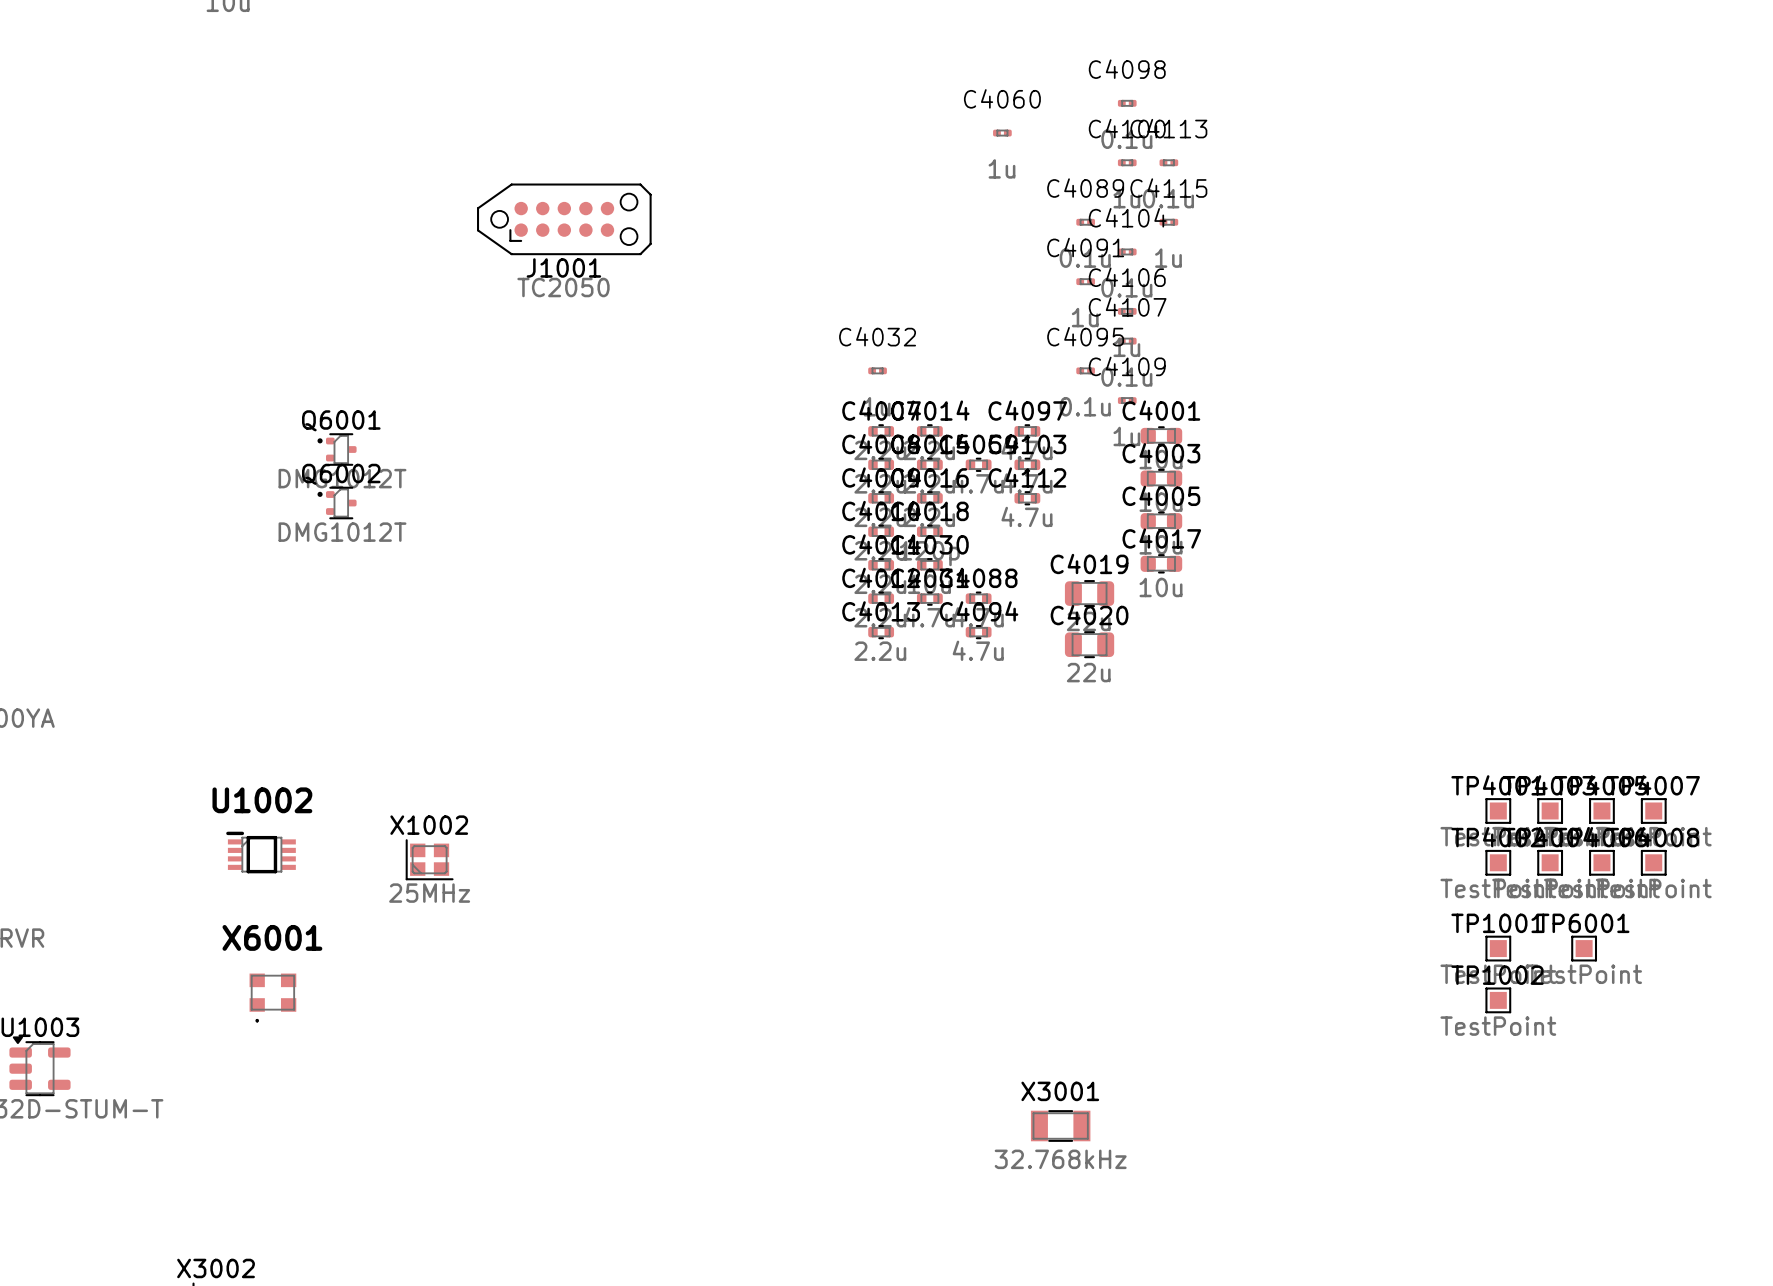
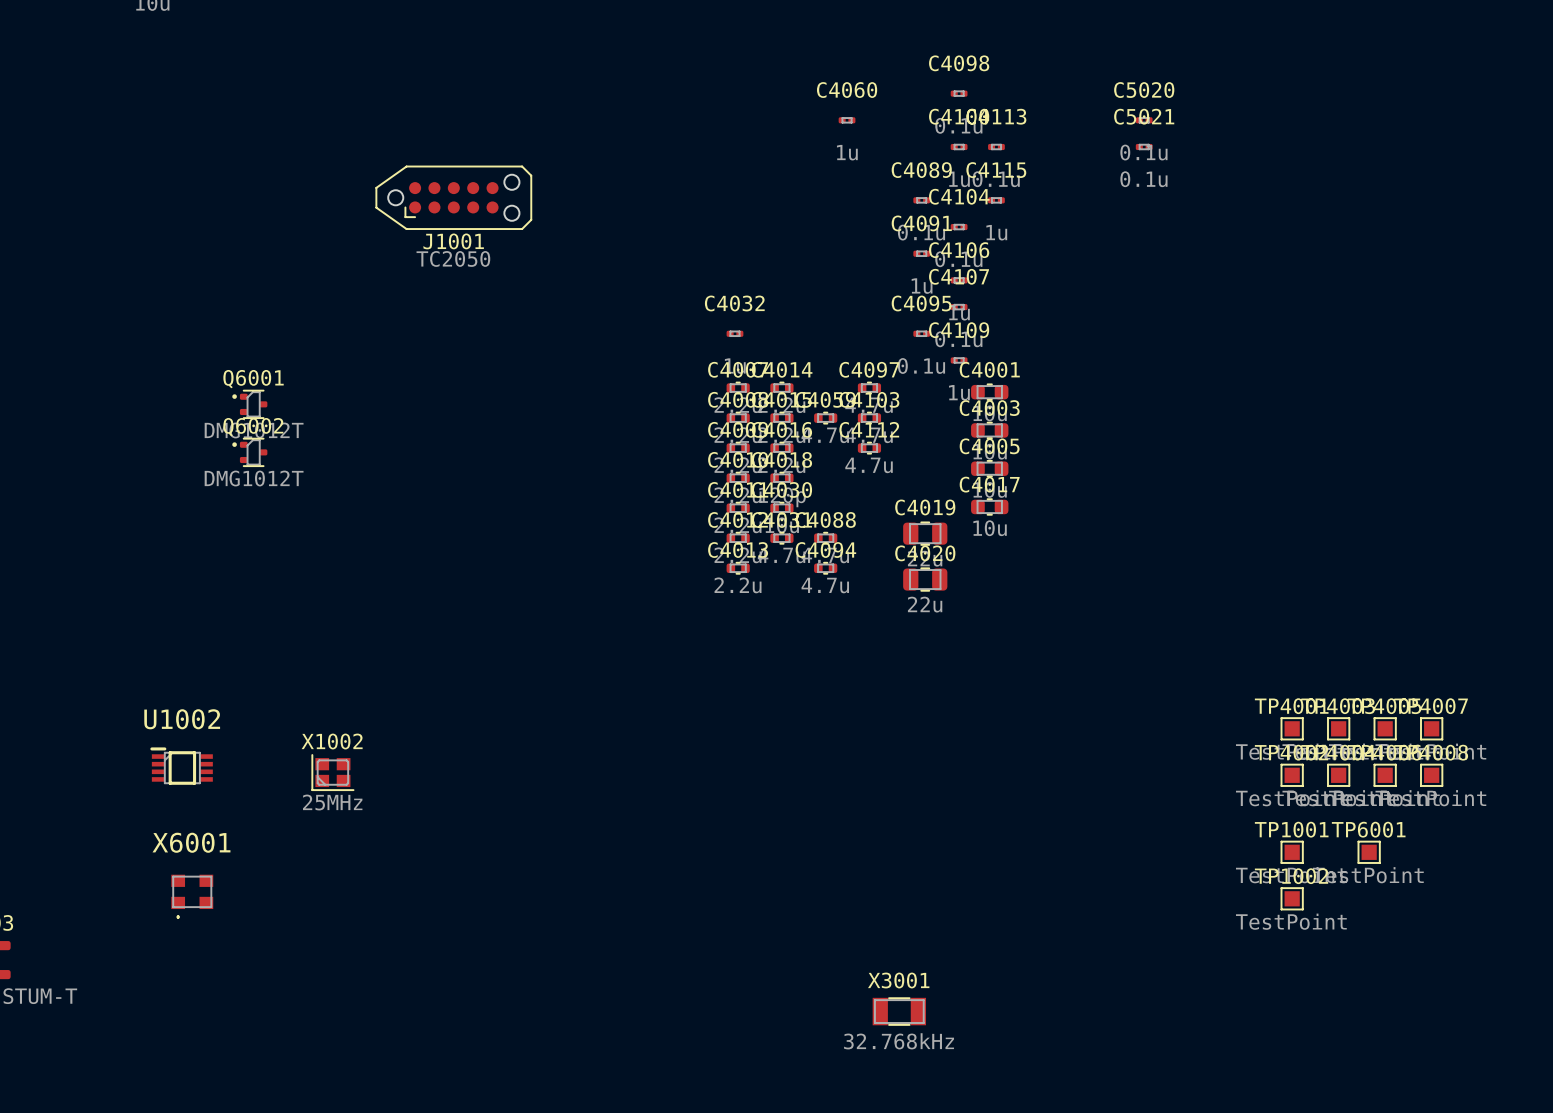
C5020: none -> 0.1u (1144, 120)
C5021: none -> 0.1u (1144, 147)

